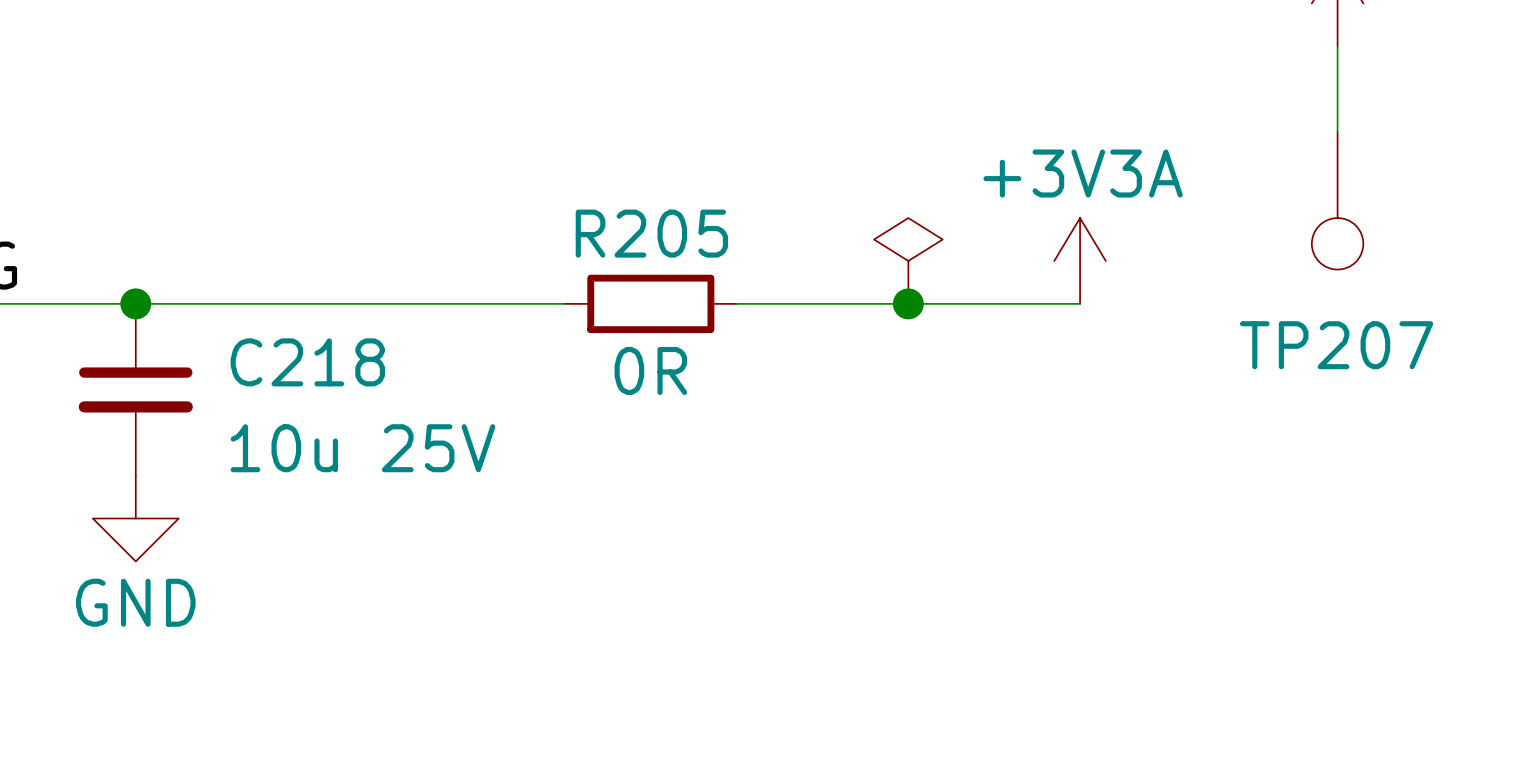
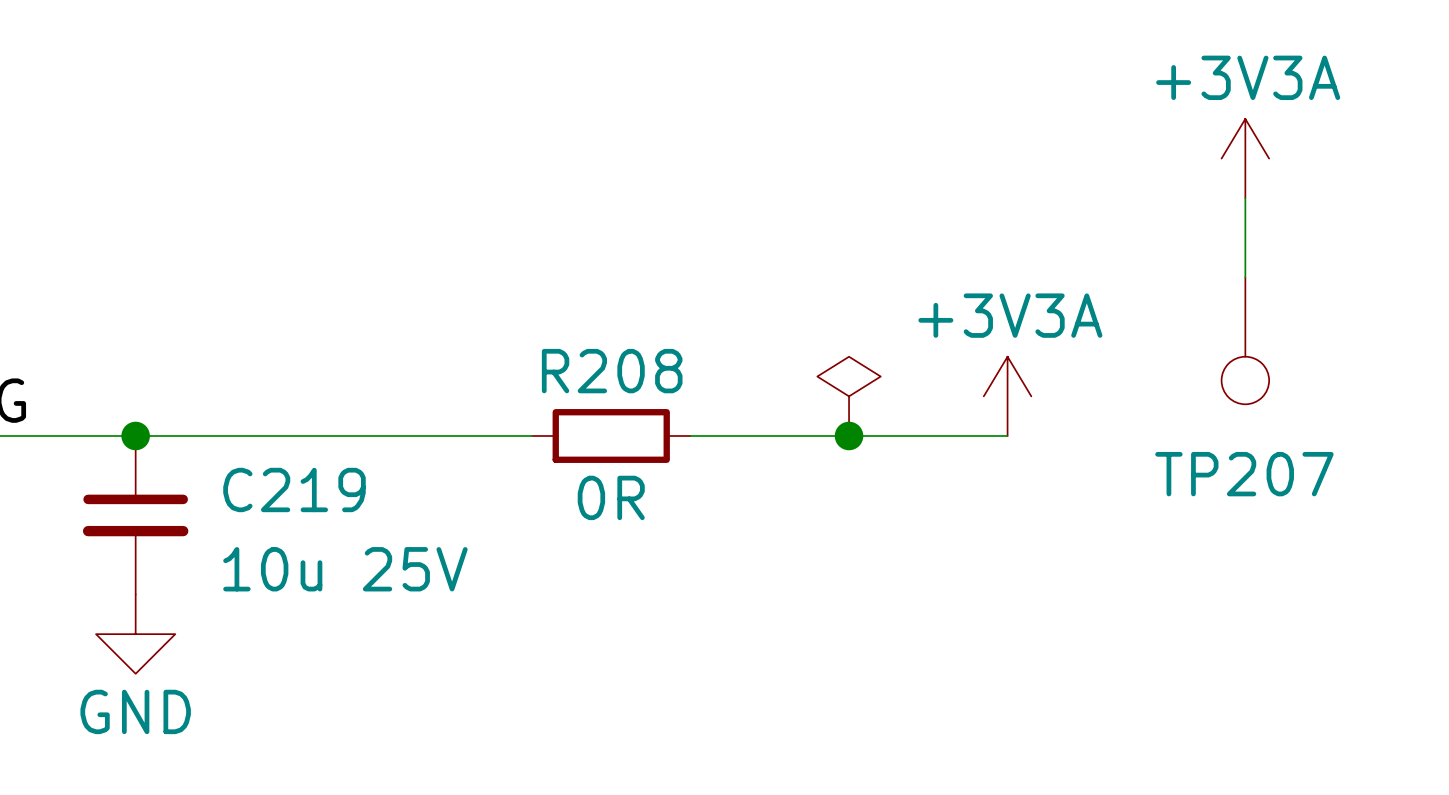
R205 name: R205 (651, 233) -> R208 (612, 371)
C218 name: C218 (307, 362) -> C219 (294, 489)

